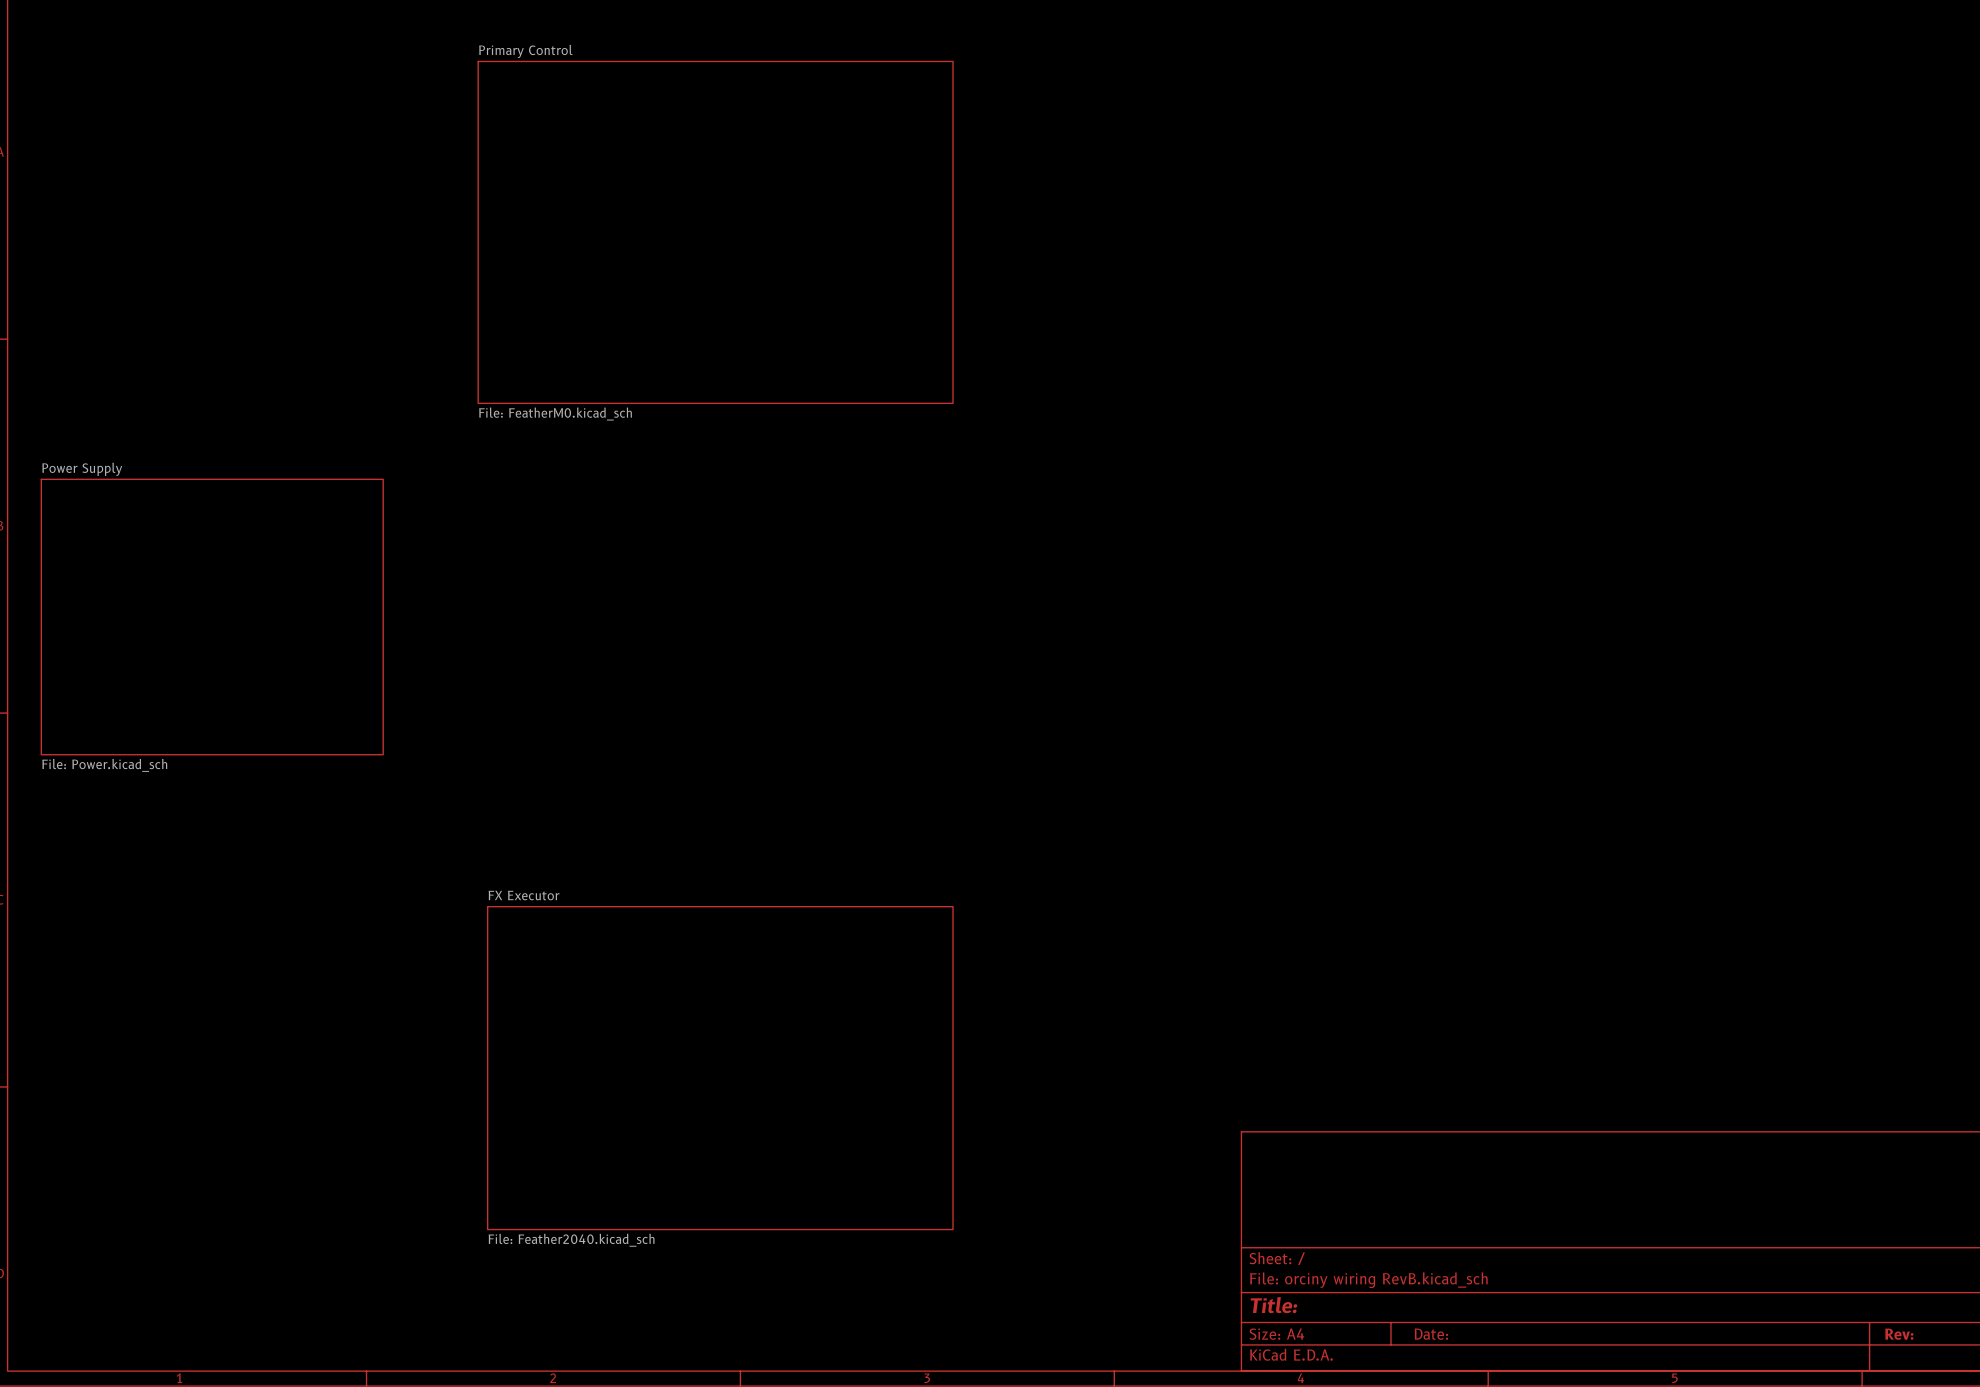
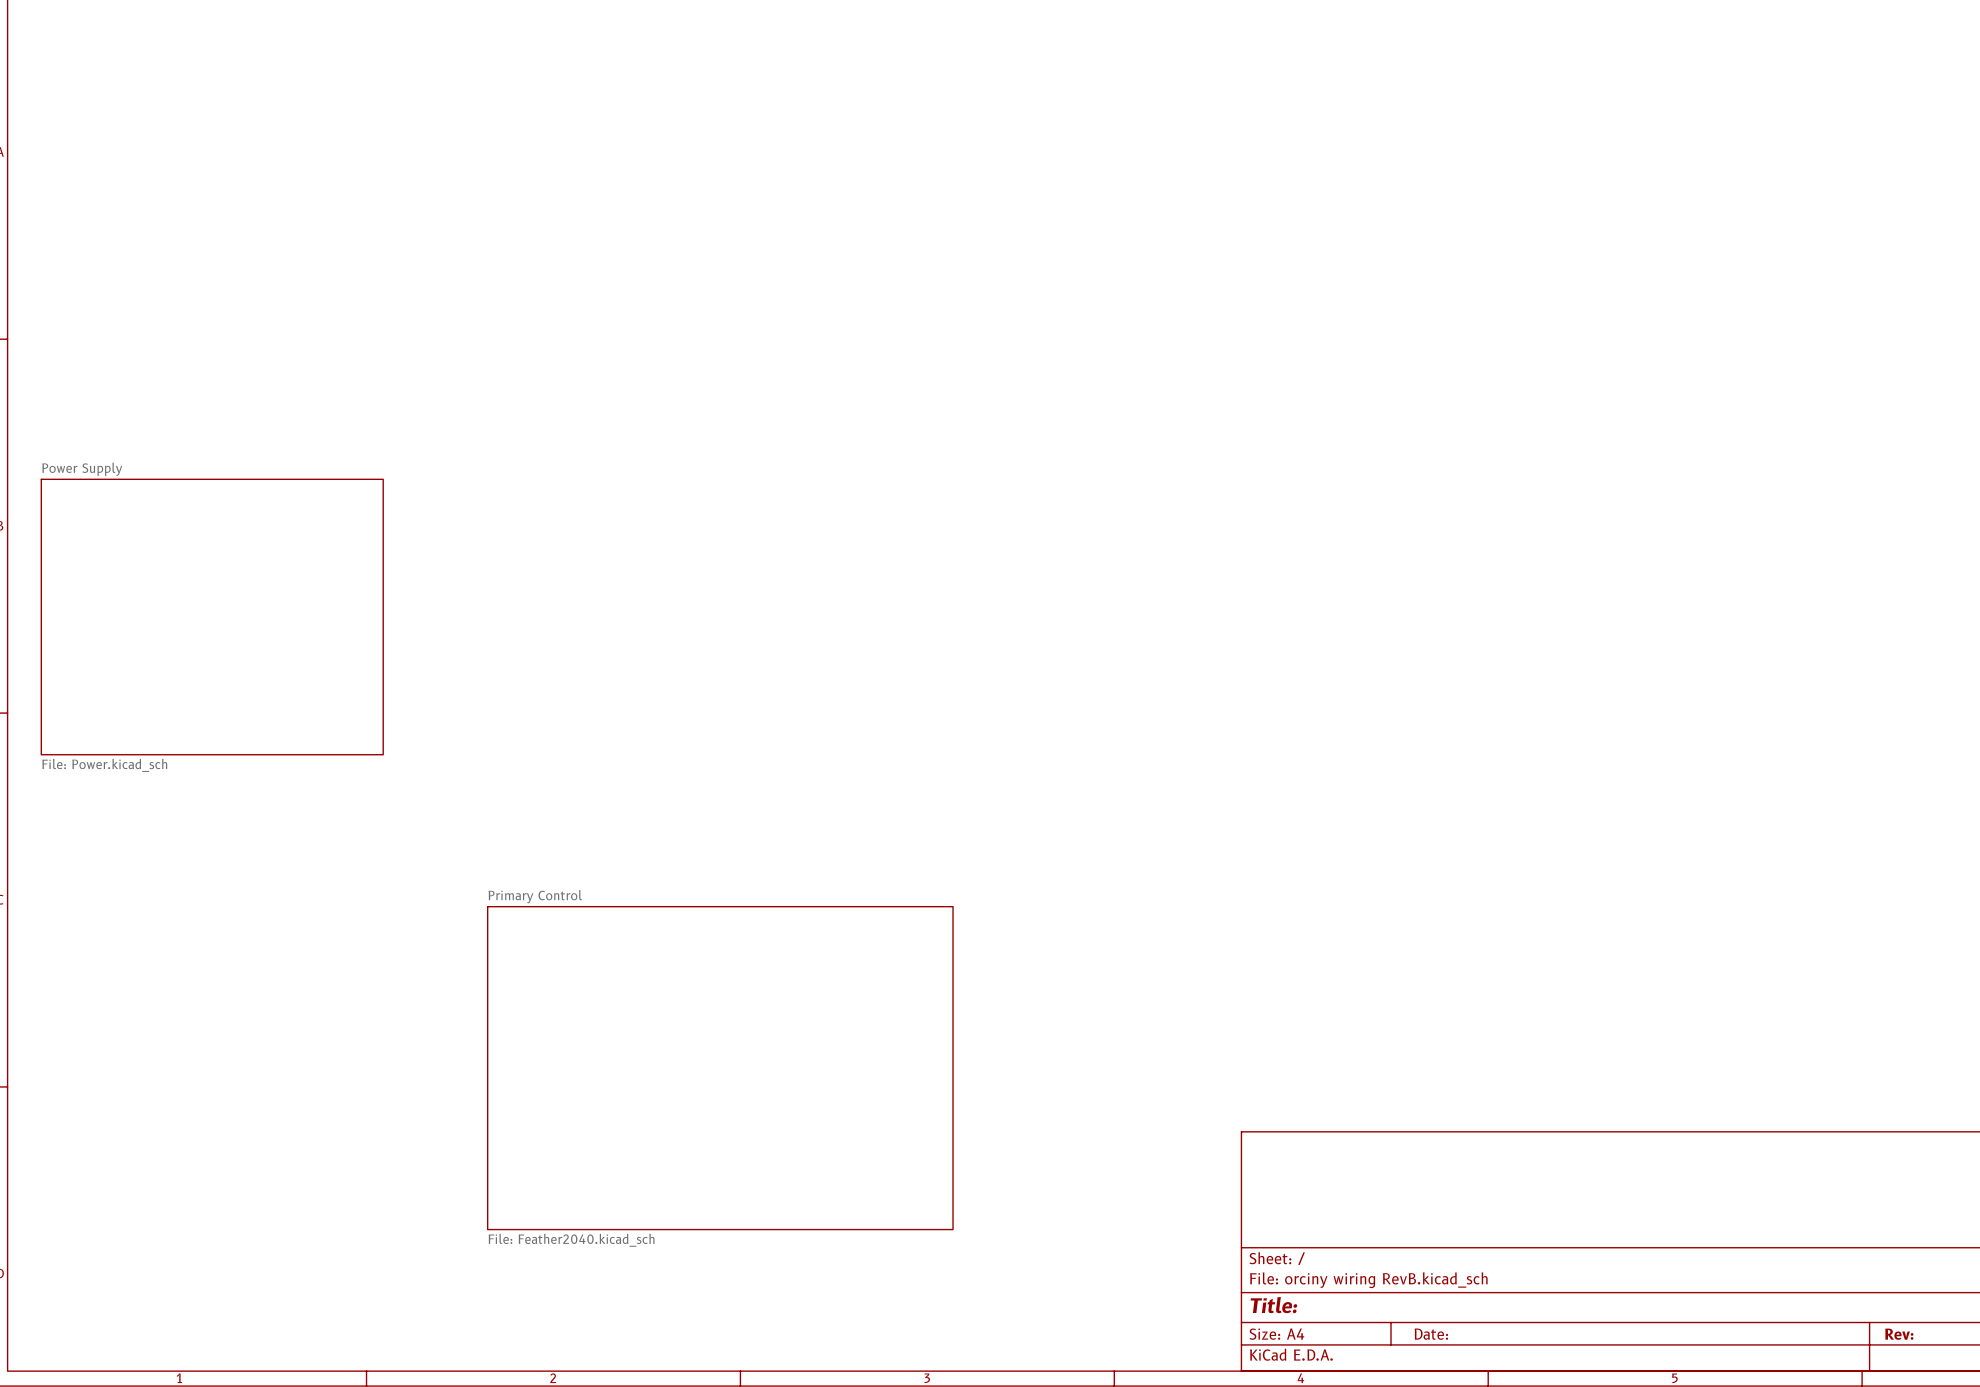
sheet Primary Control: File: FeatherM0.kicad_sch (715, 232) -> none
sheet FX Executor name: FX Executor (524, 895) -> Primary Control (535, 896)

